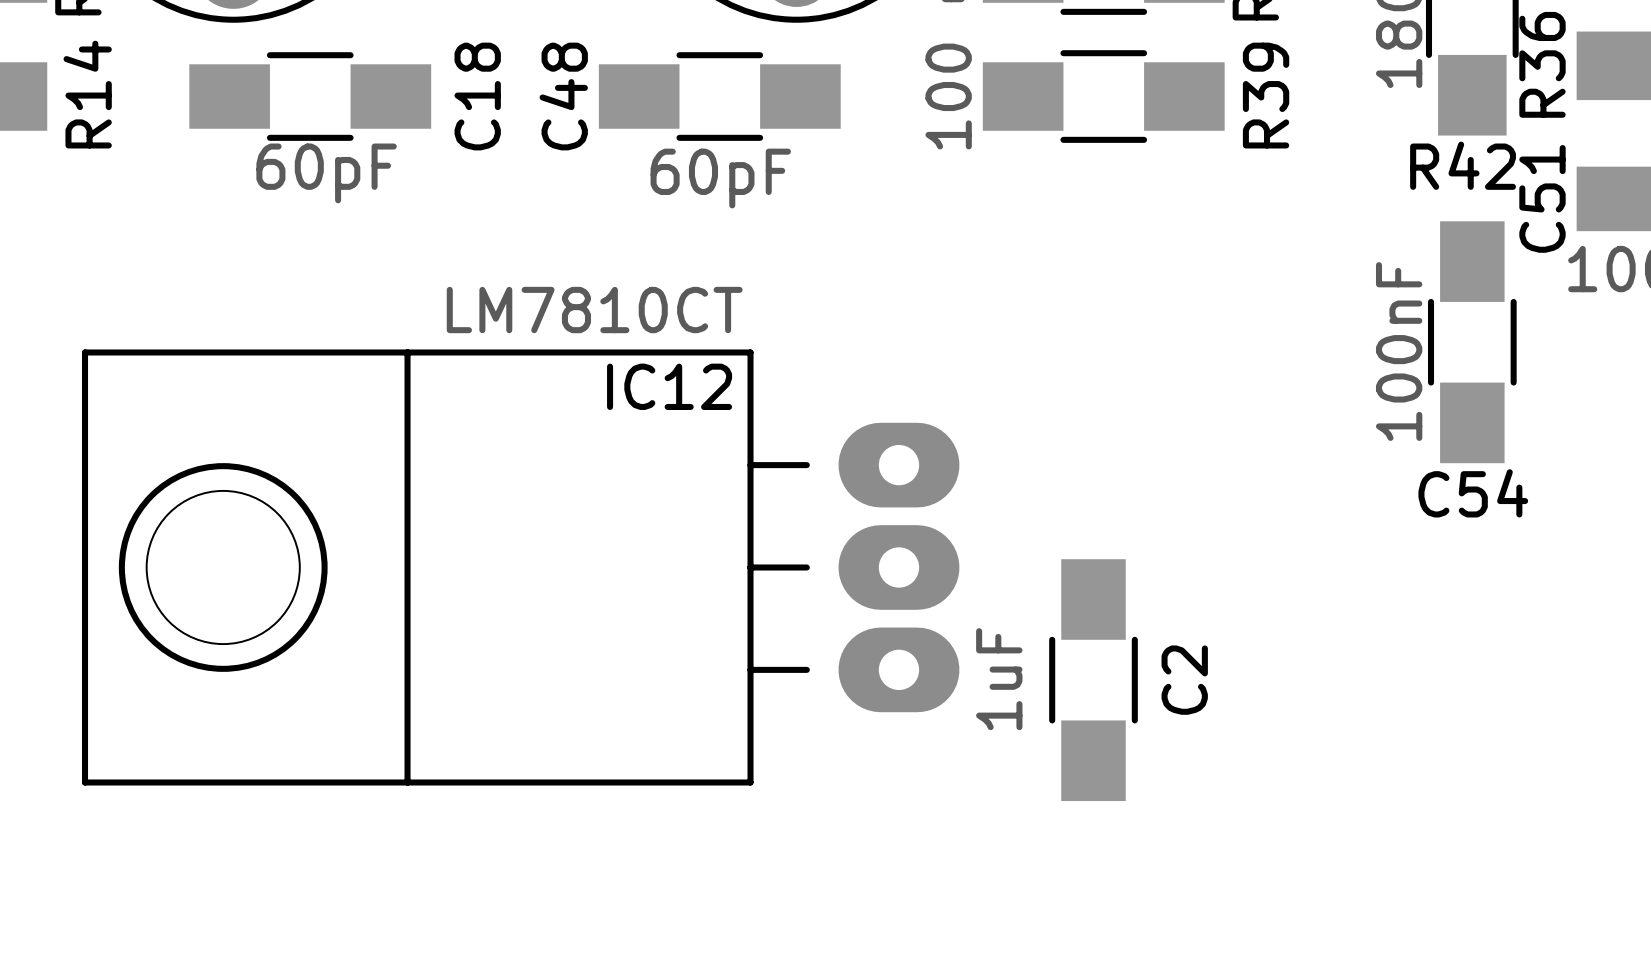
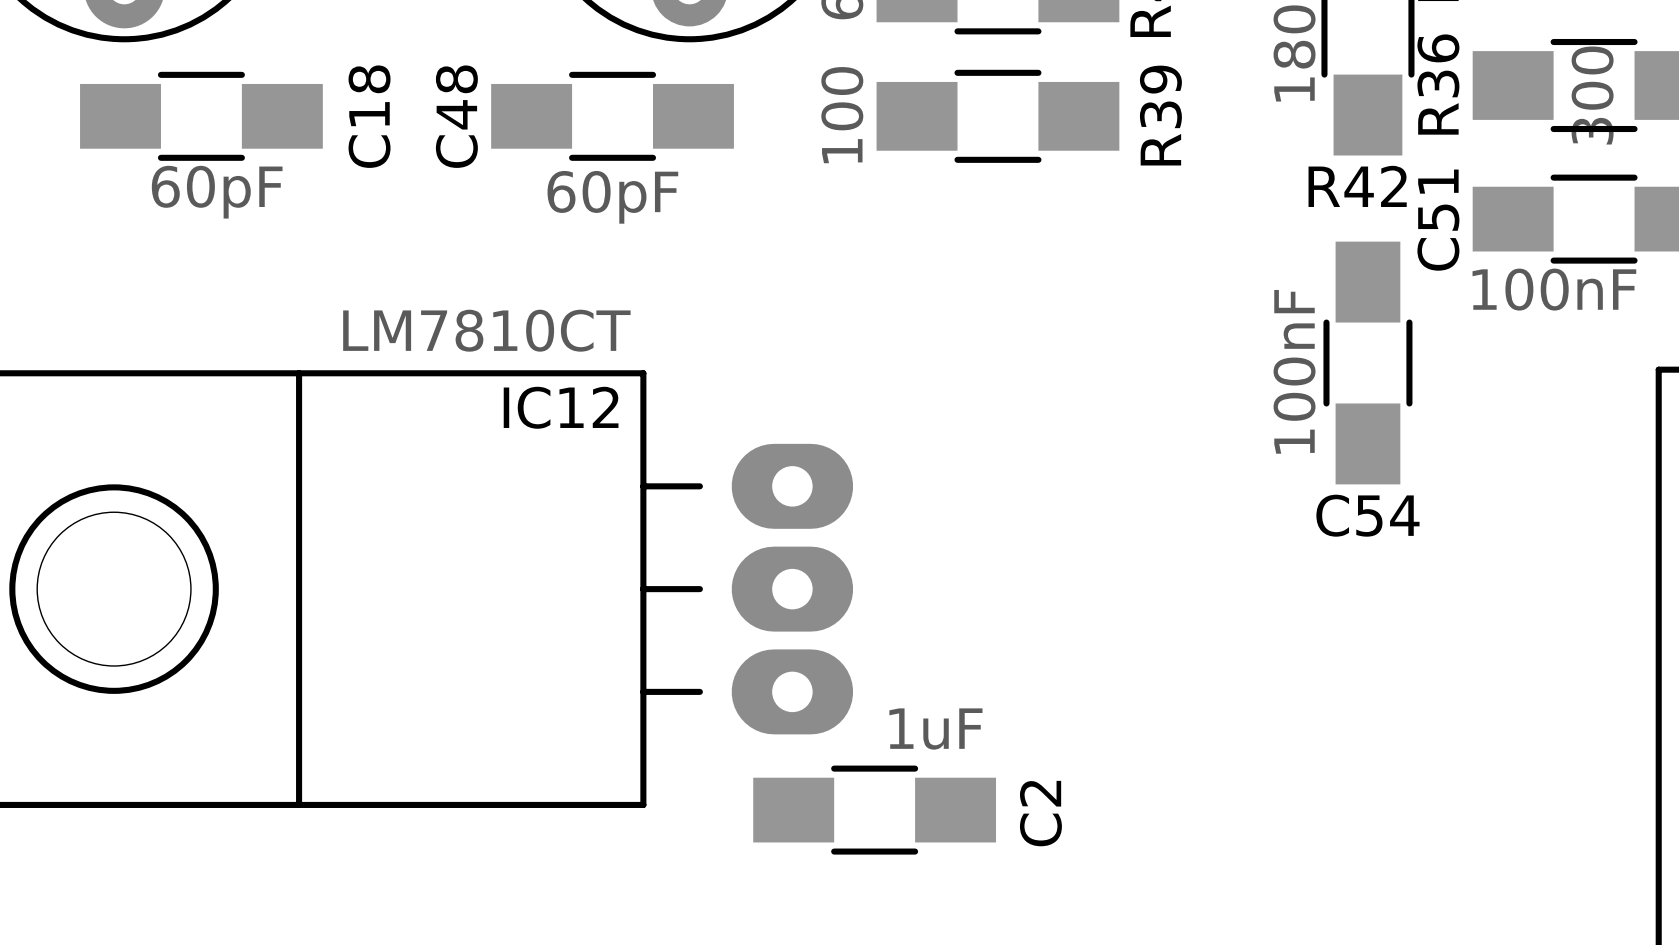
C2 rotation: 0° (1093, 680) -> 90° clockwise (874, 810)
C2 position: (1093, 680) -> (874, 810)

